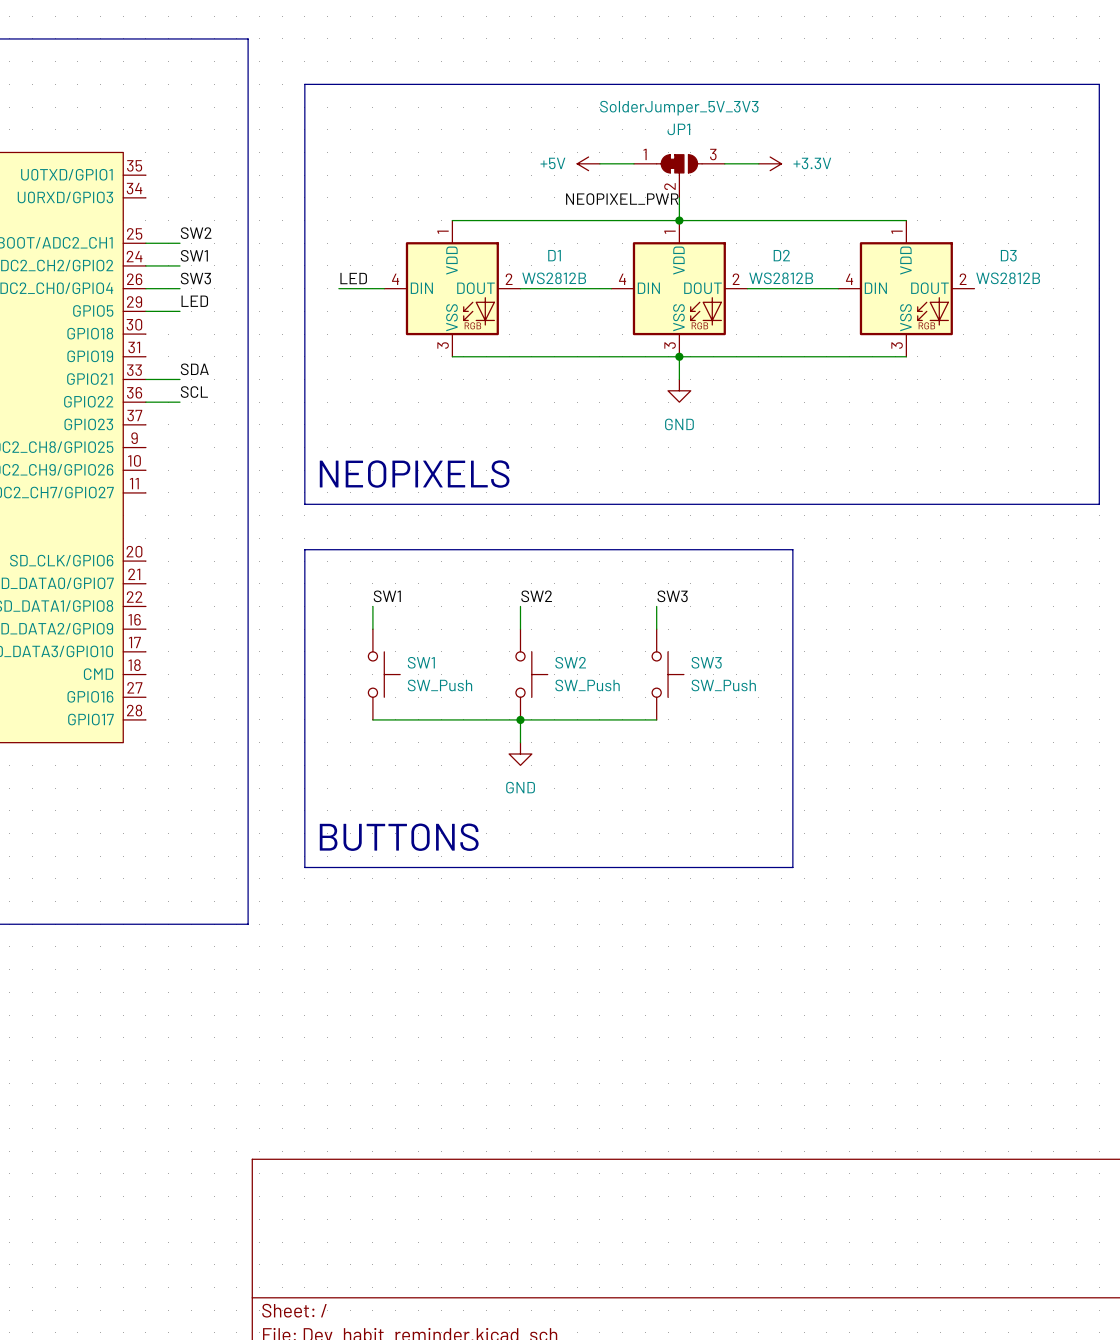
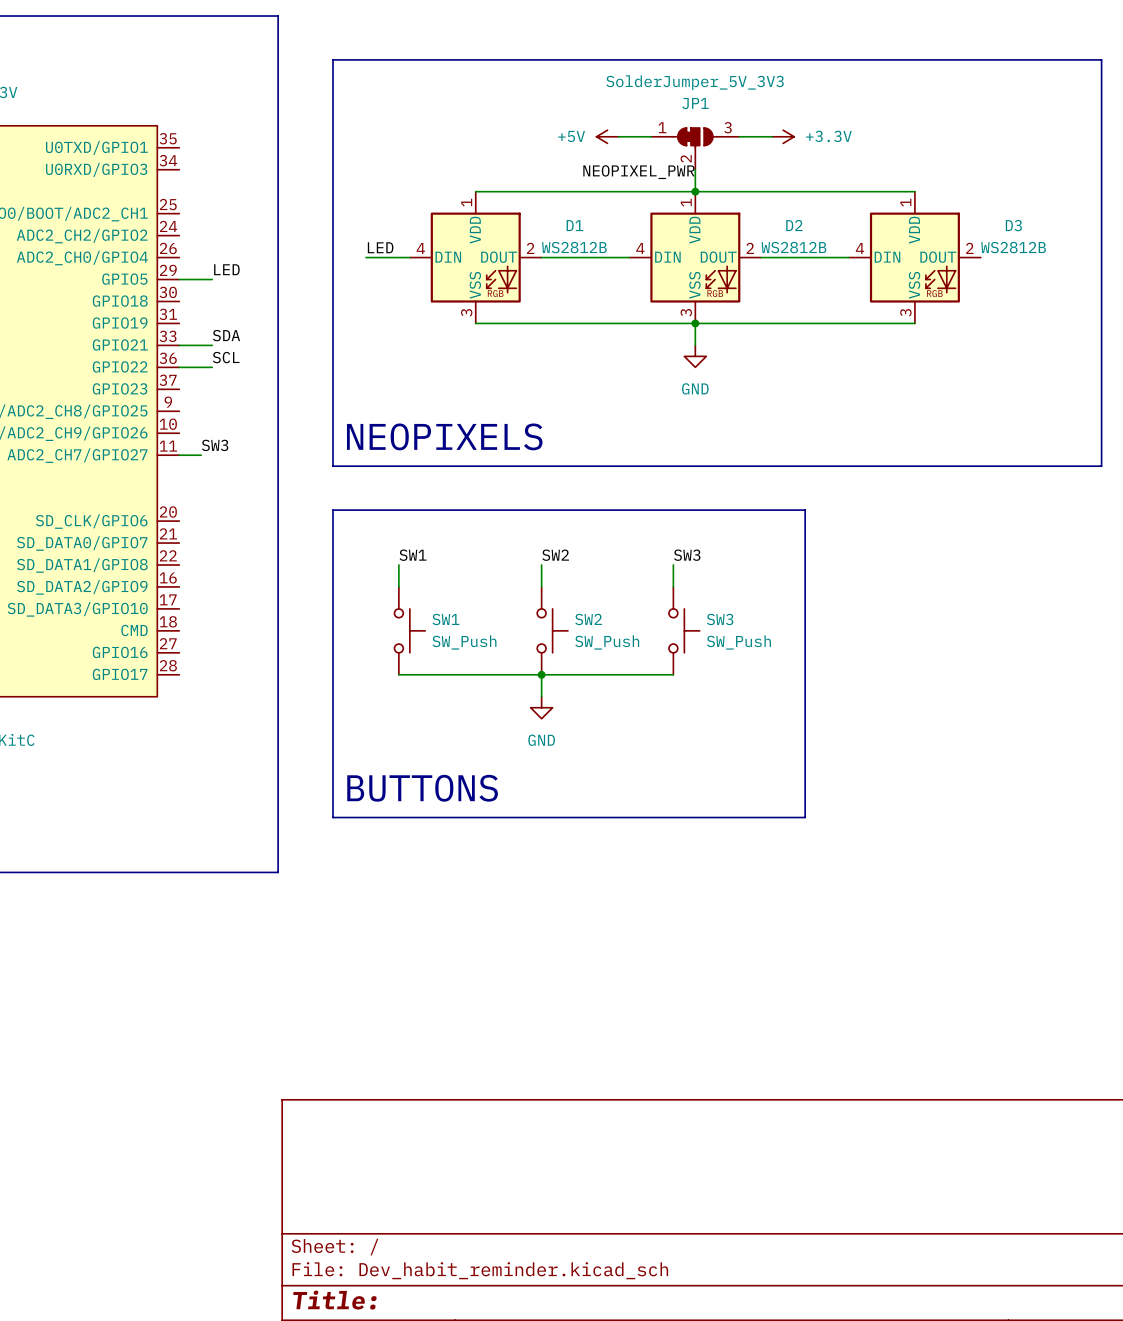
label: SW2 (196, 233) -> none
wire: (145, 243) (180, 243) -> none
label: SW1 (194, 255) -> none
wire: (145, 265) (180, 265) -> none
label position: SW3 (195, 278) -> SW3 (215, 445)
wire: (145, 288) (180, 288) -> none
wire: none -> (179, 455) (201, 455)

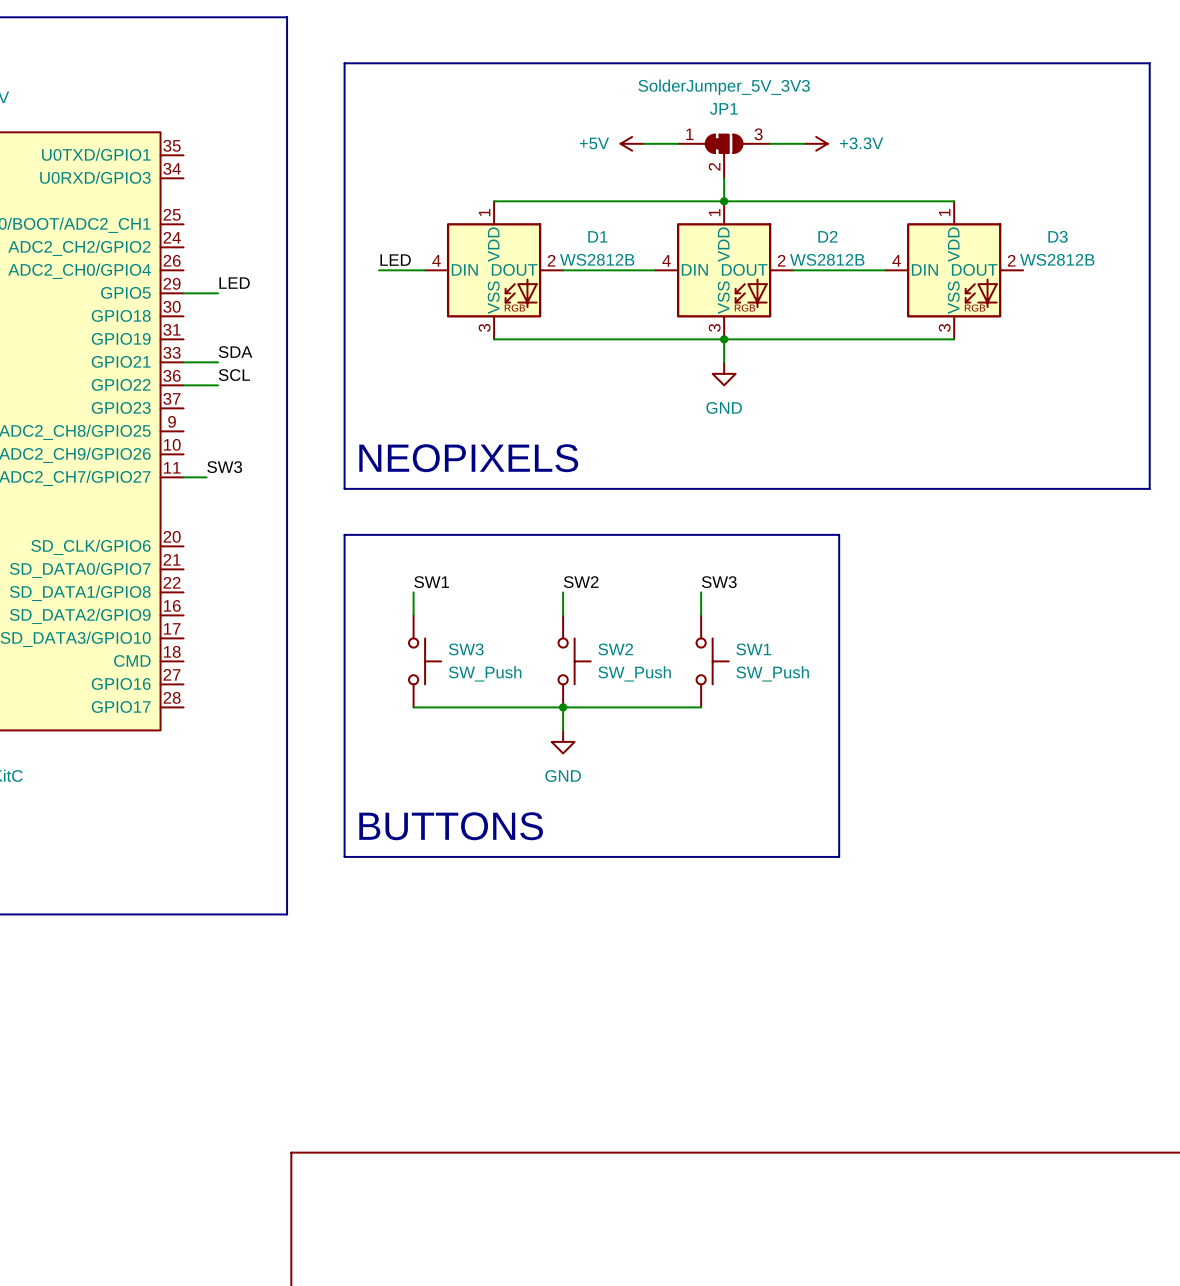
label: NEOPIXEL_PWR (638, 172) -> none
SW1 name: SW1 (445, 619) -> SW3 (466, 649)
SW3 name: SW3 (720, 619) -> SW1 (753, 649)

